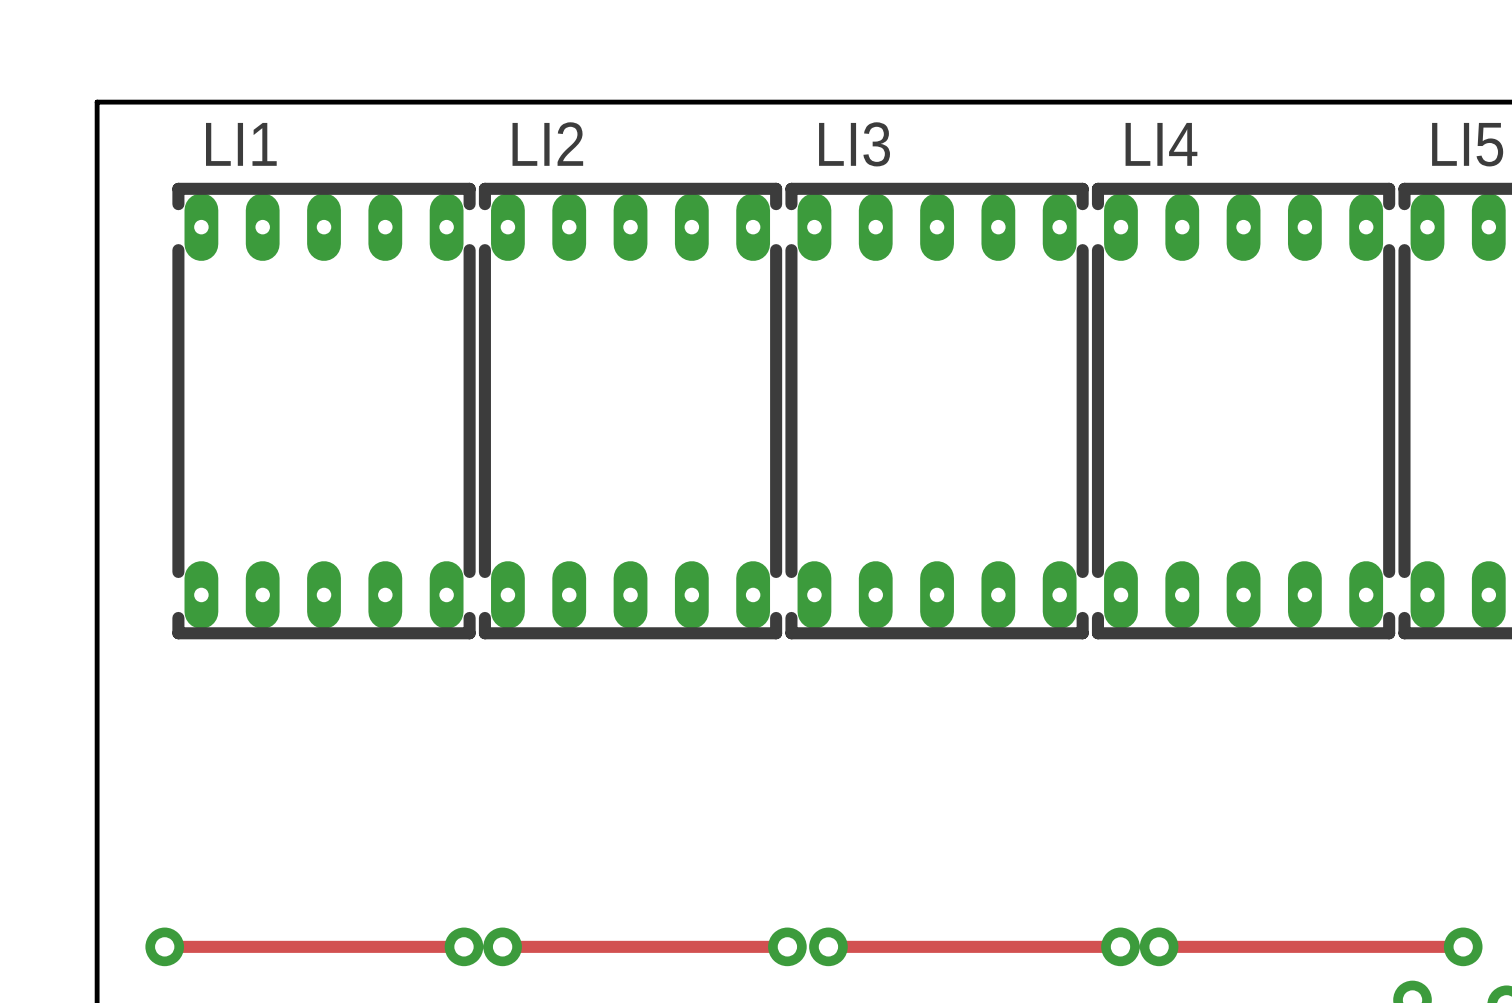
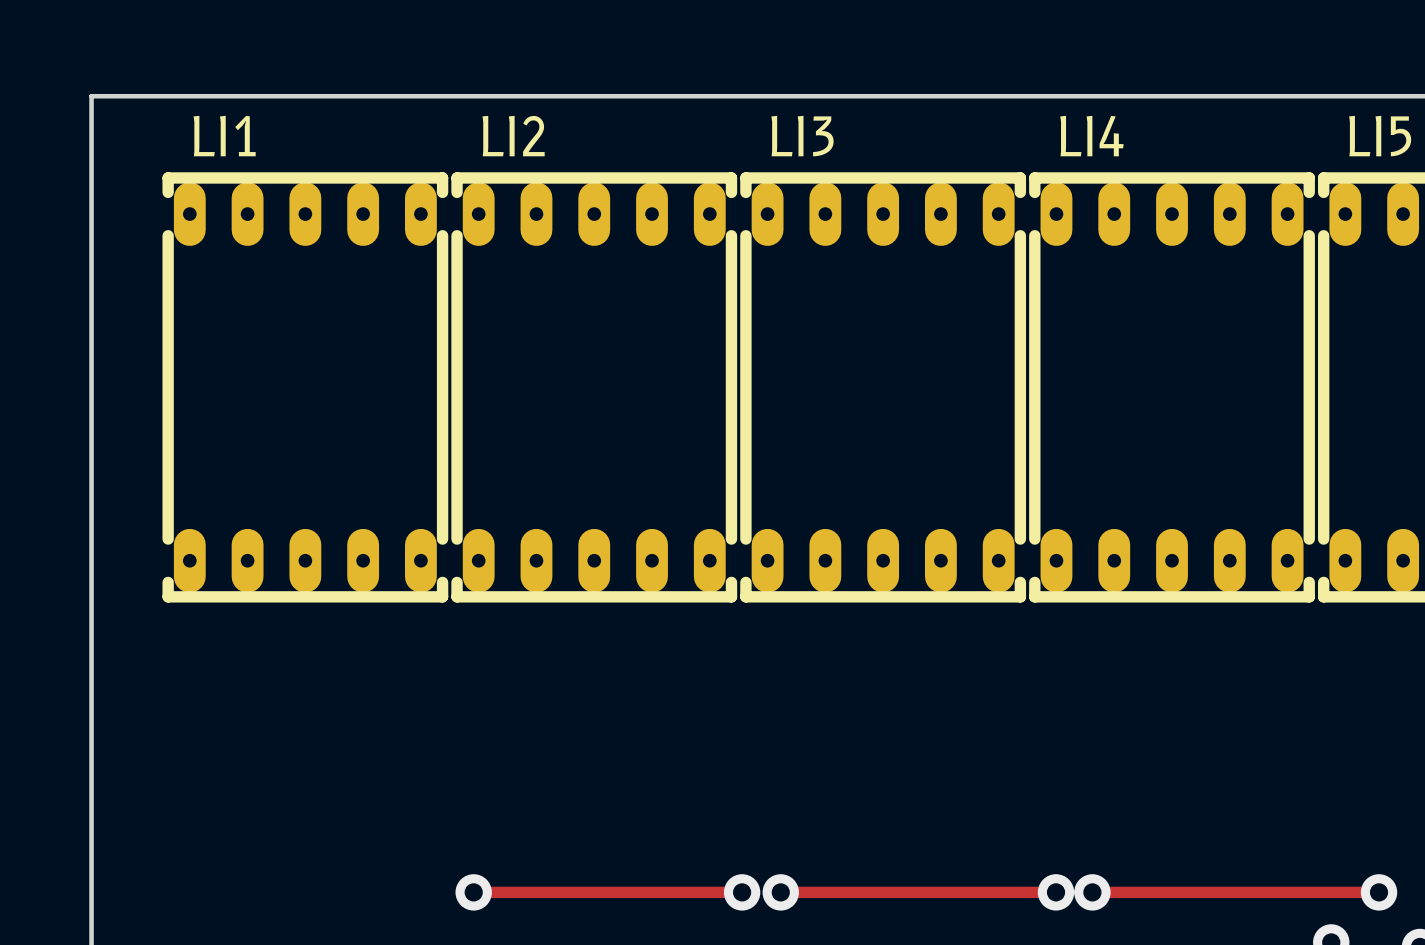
track: (164, 946) (463, 946) -> none
via: (164, 946) -> none
via: (463, 946) -> none

